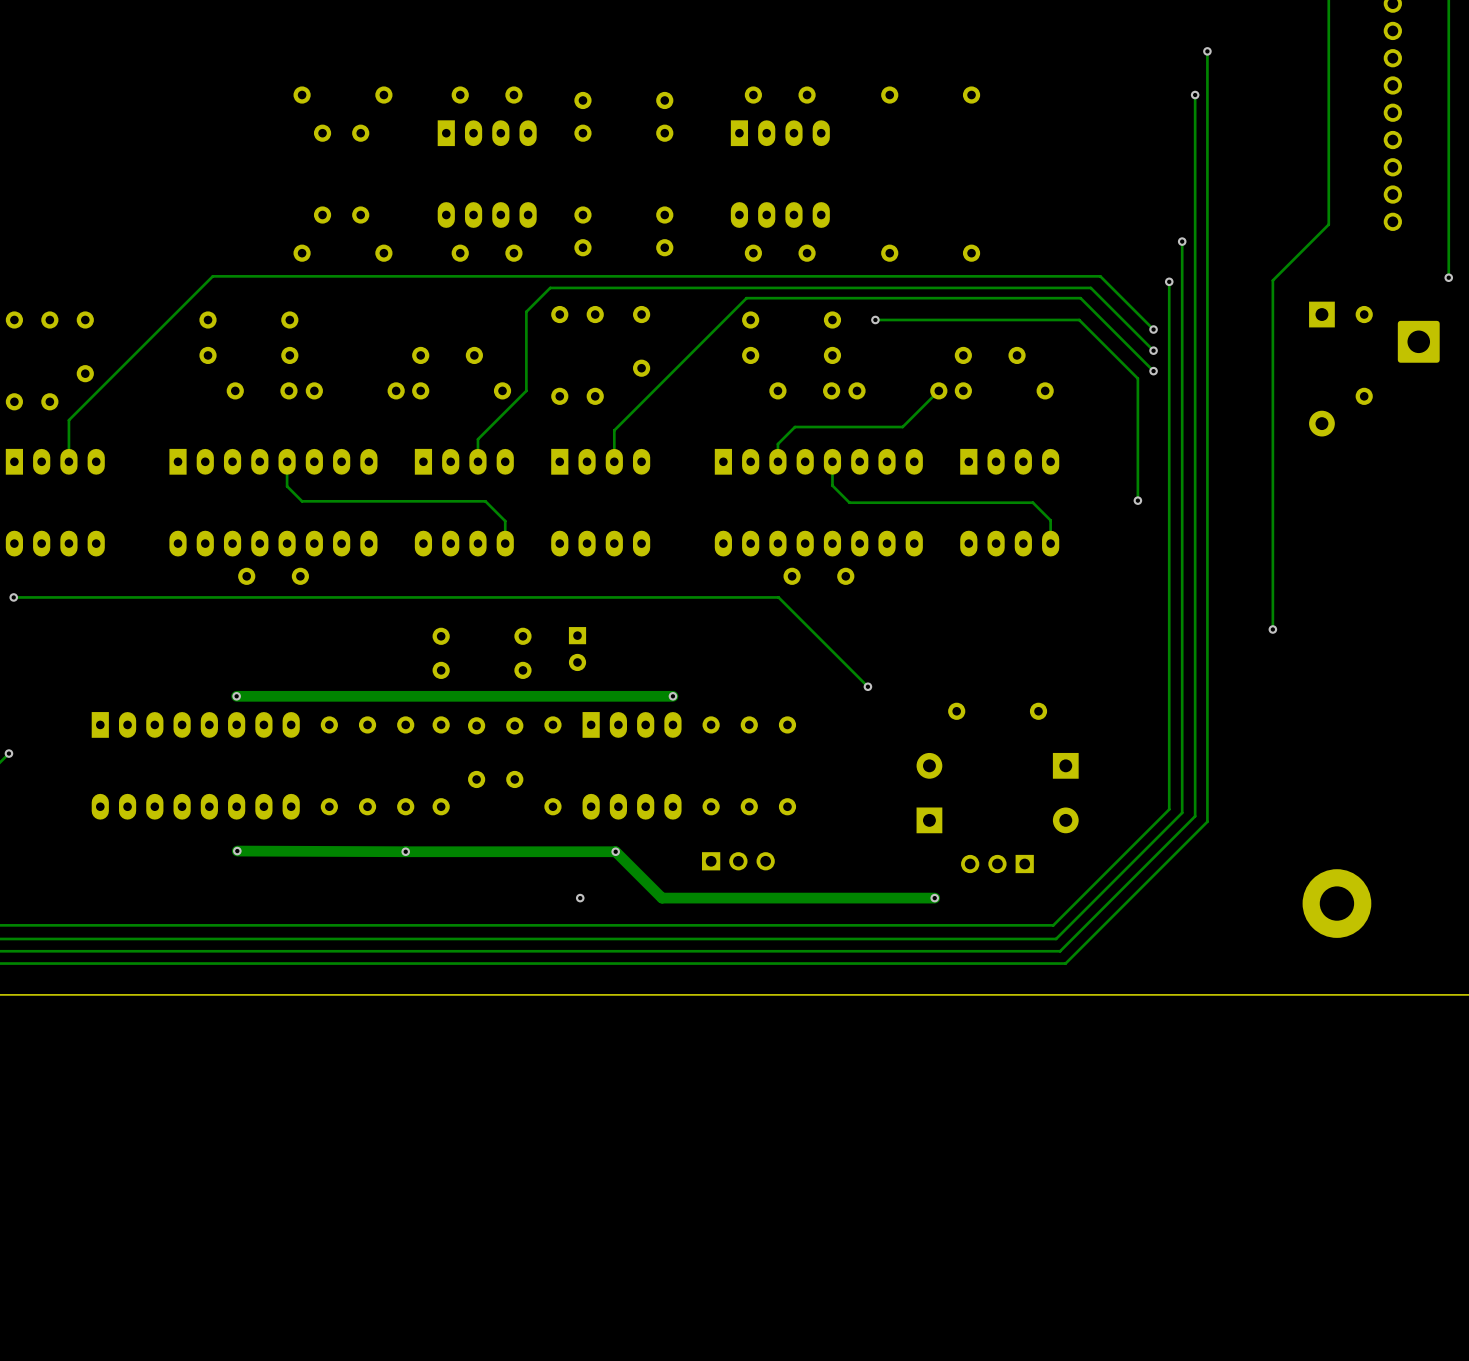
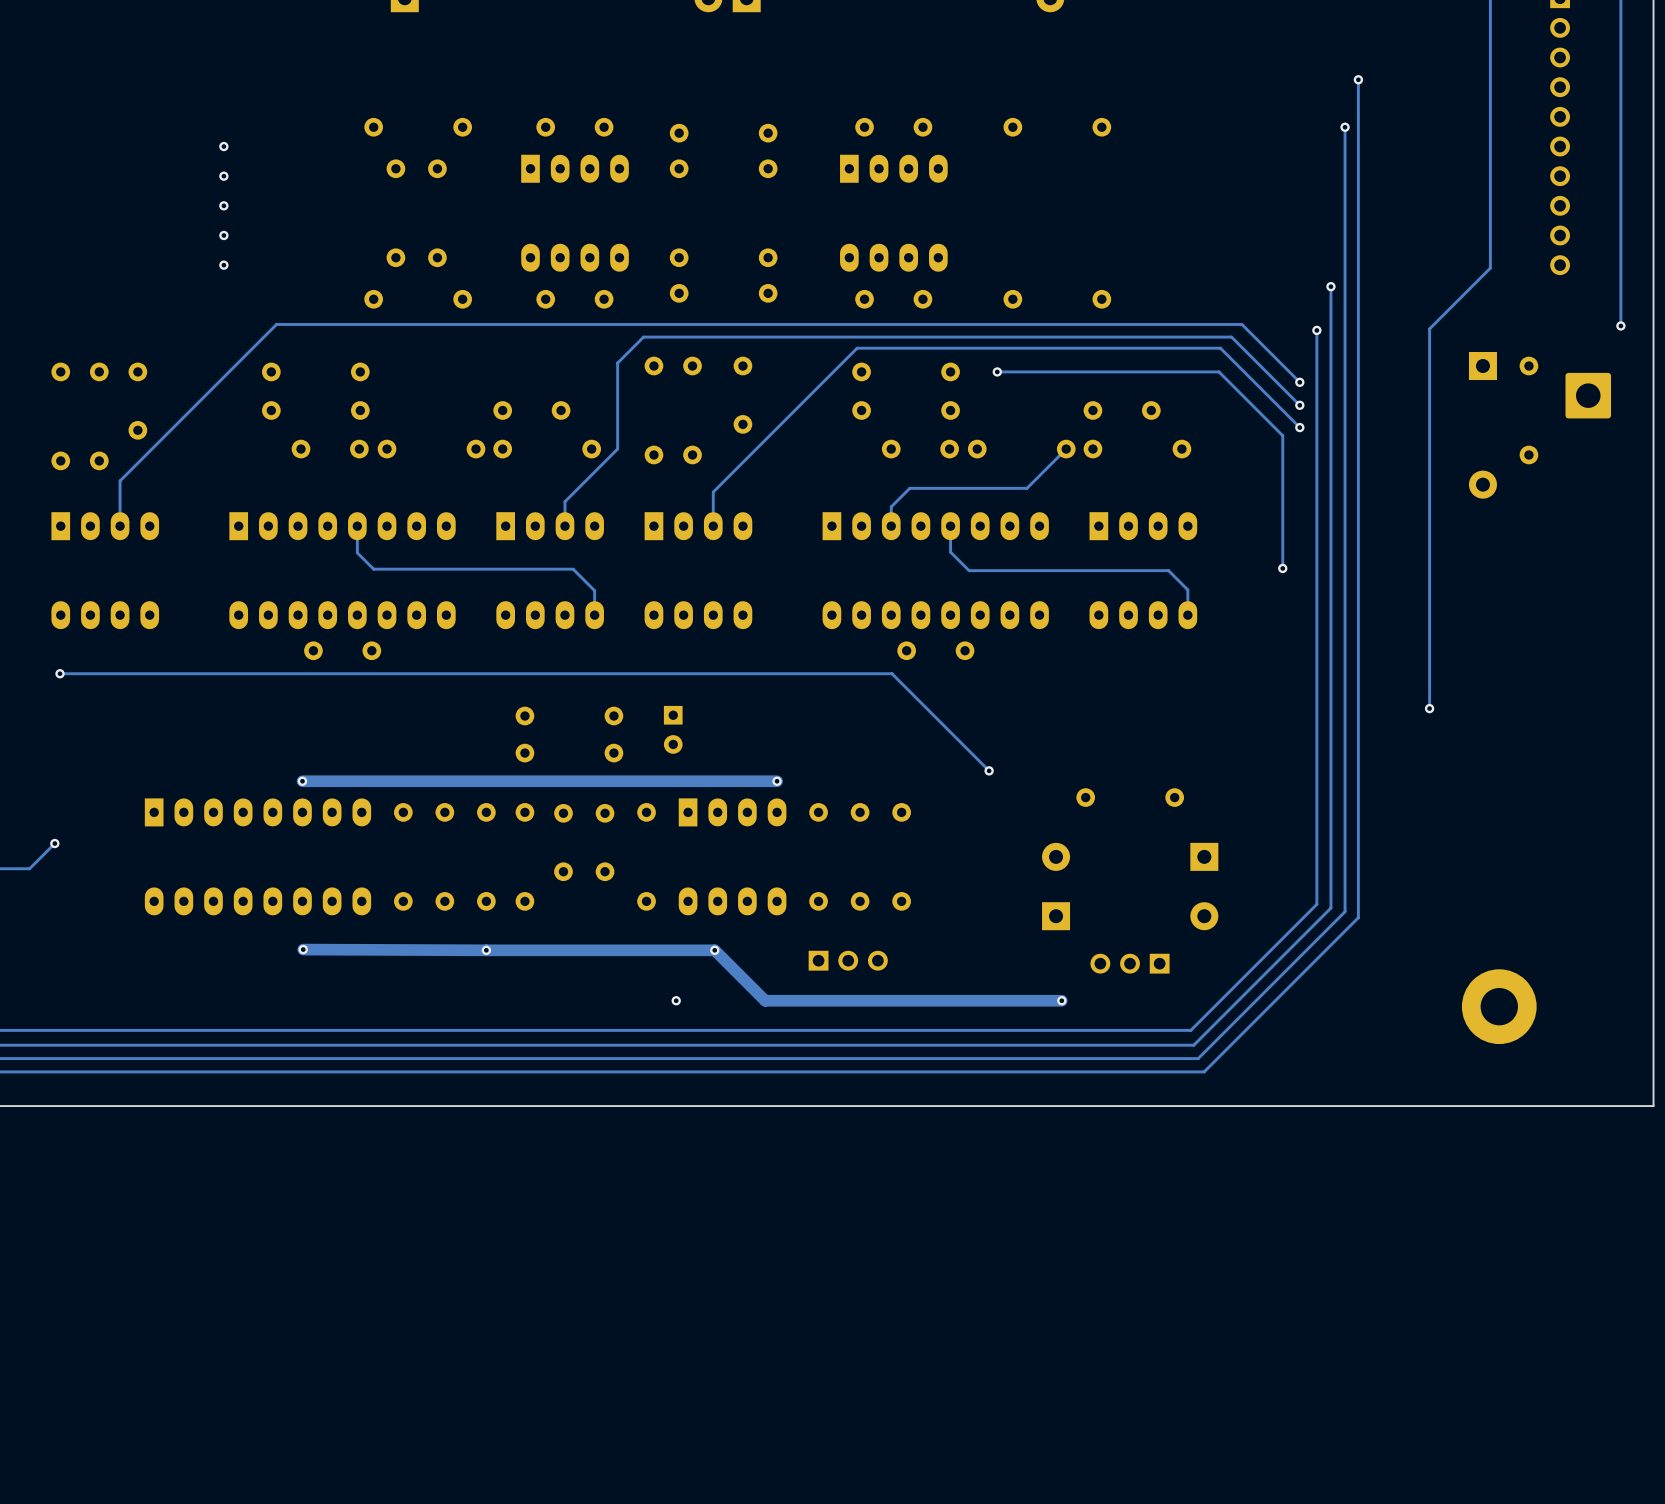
via: none -> (223, 146)
via: none -> (223, 176)
via: none -> (223, 205)
via: none -> (223, 235)
via: none -> (223, 265)

